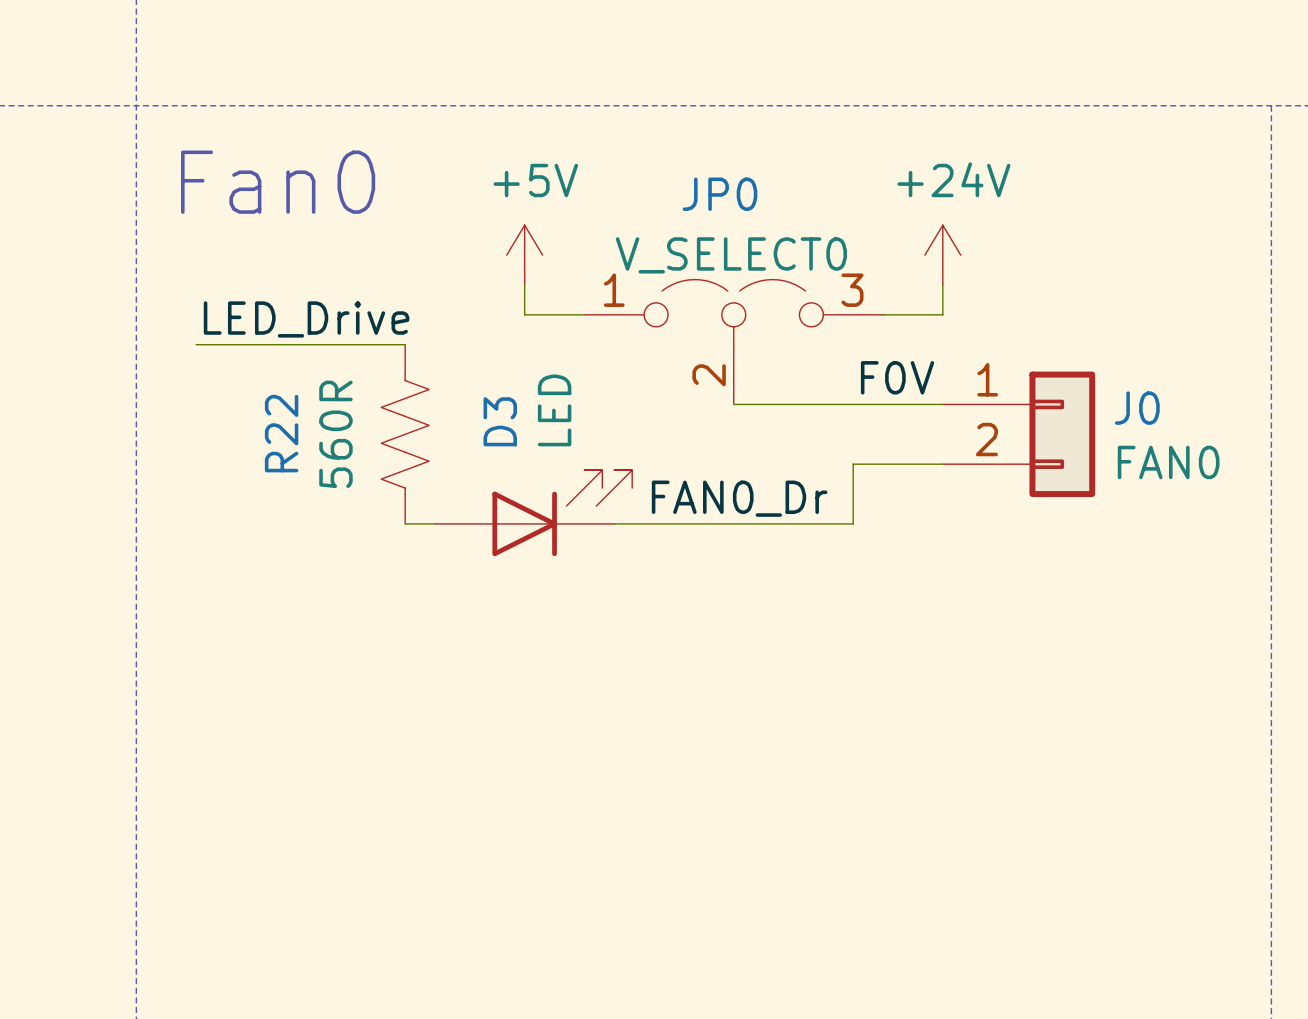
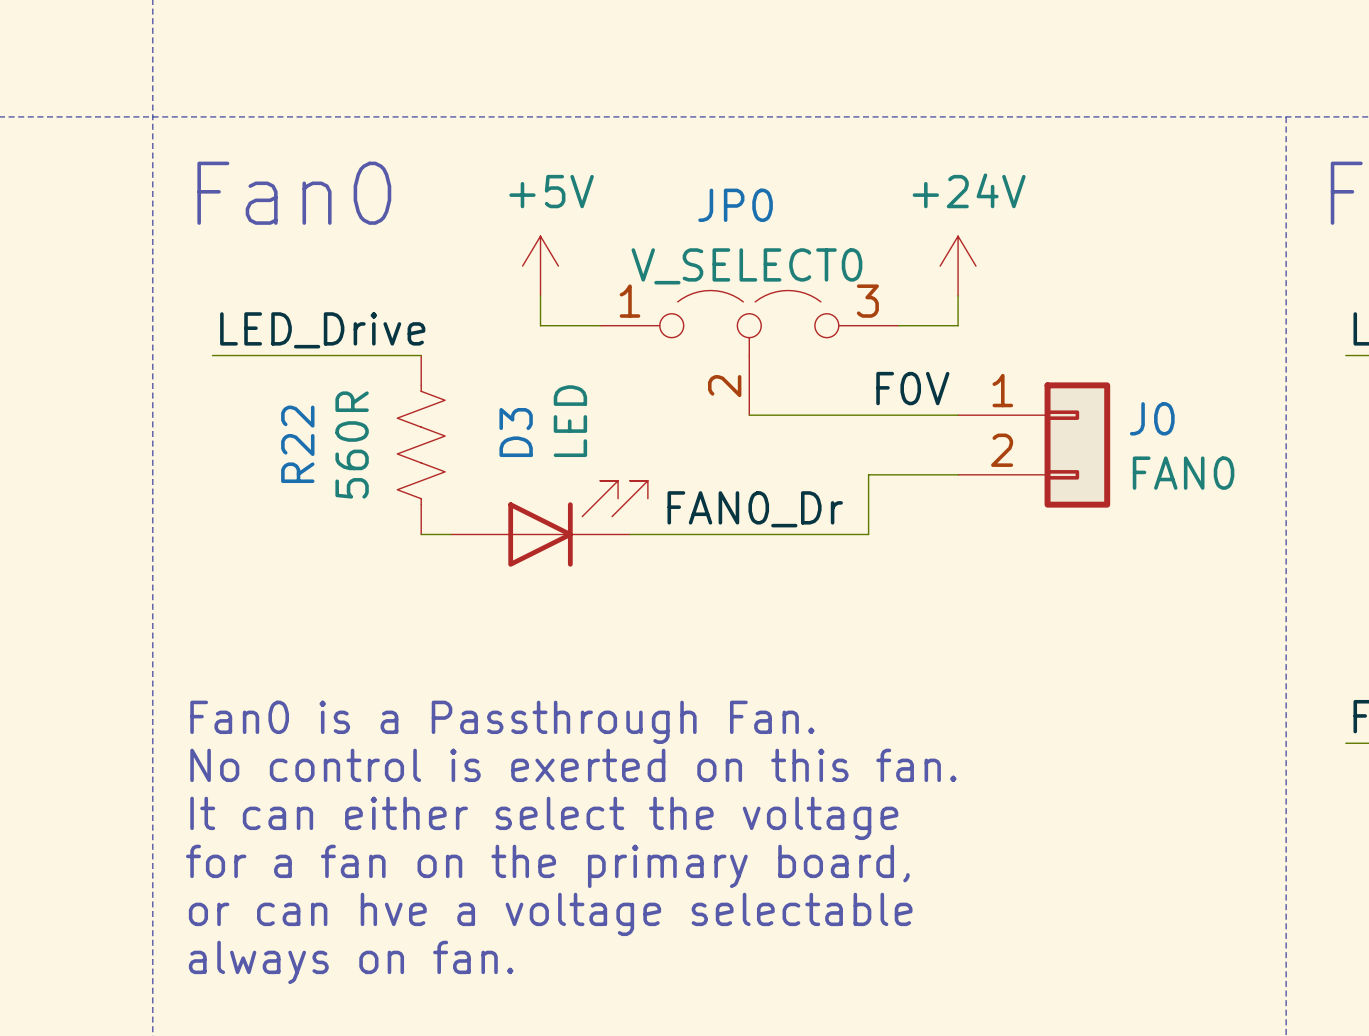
text: none -> Fan0 is a Passthrough Fan. (502, 722)
text: none -> No control is exerted on this fan. (573, 765)
text: none -> It can either select the voltage (544, 818)
text: none -> for a fan on the primary board, (547, 866)
text: none -> or can hve a voltage selectable (550, 914)
text: none -> always on fan. (351, 962)

